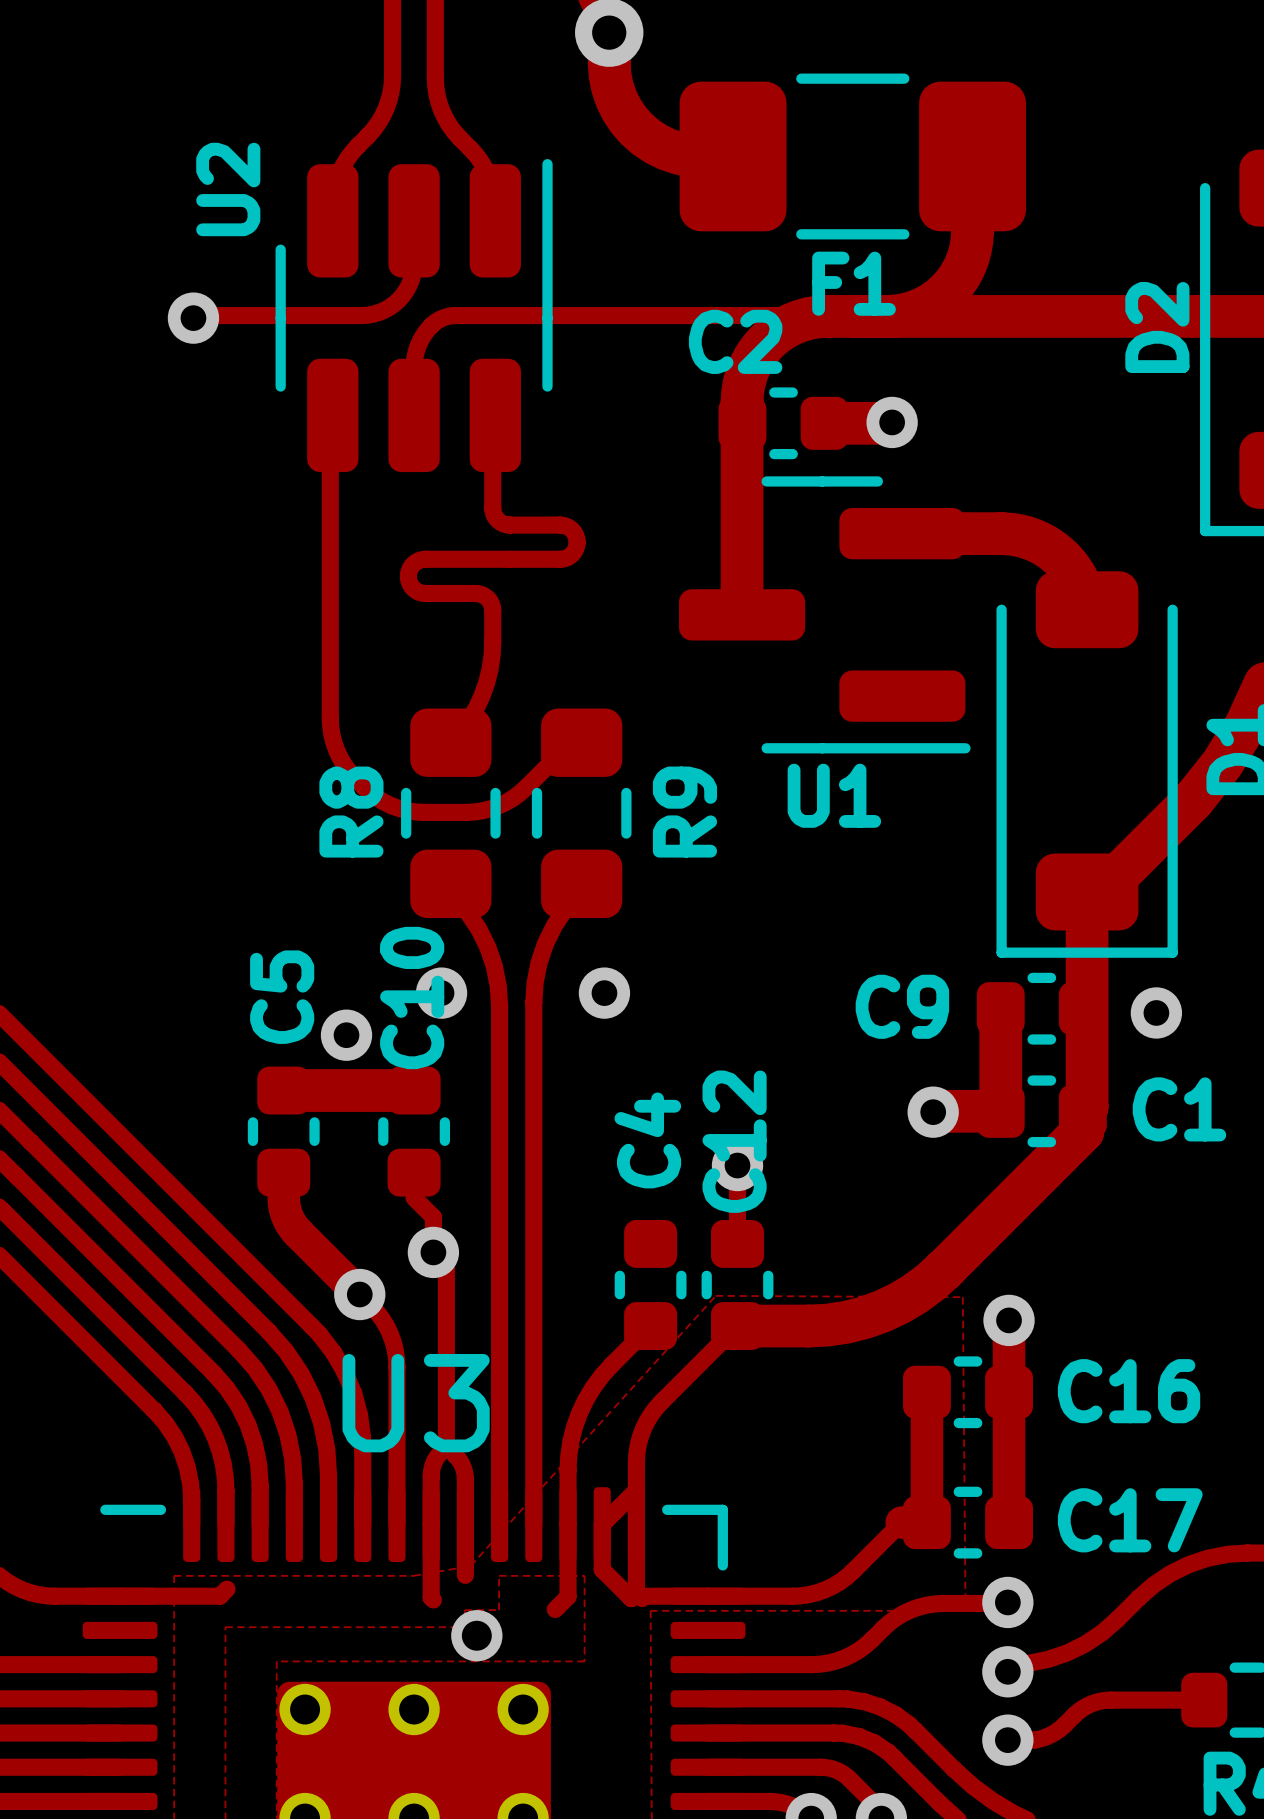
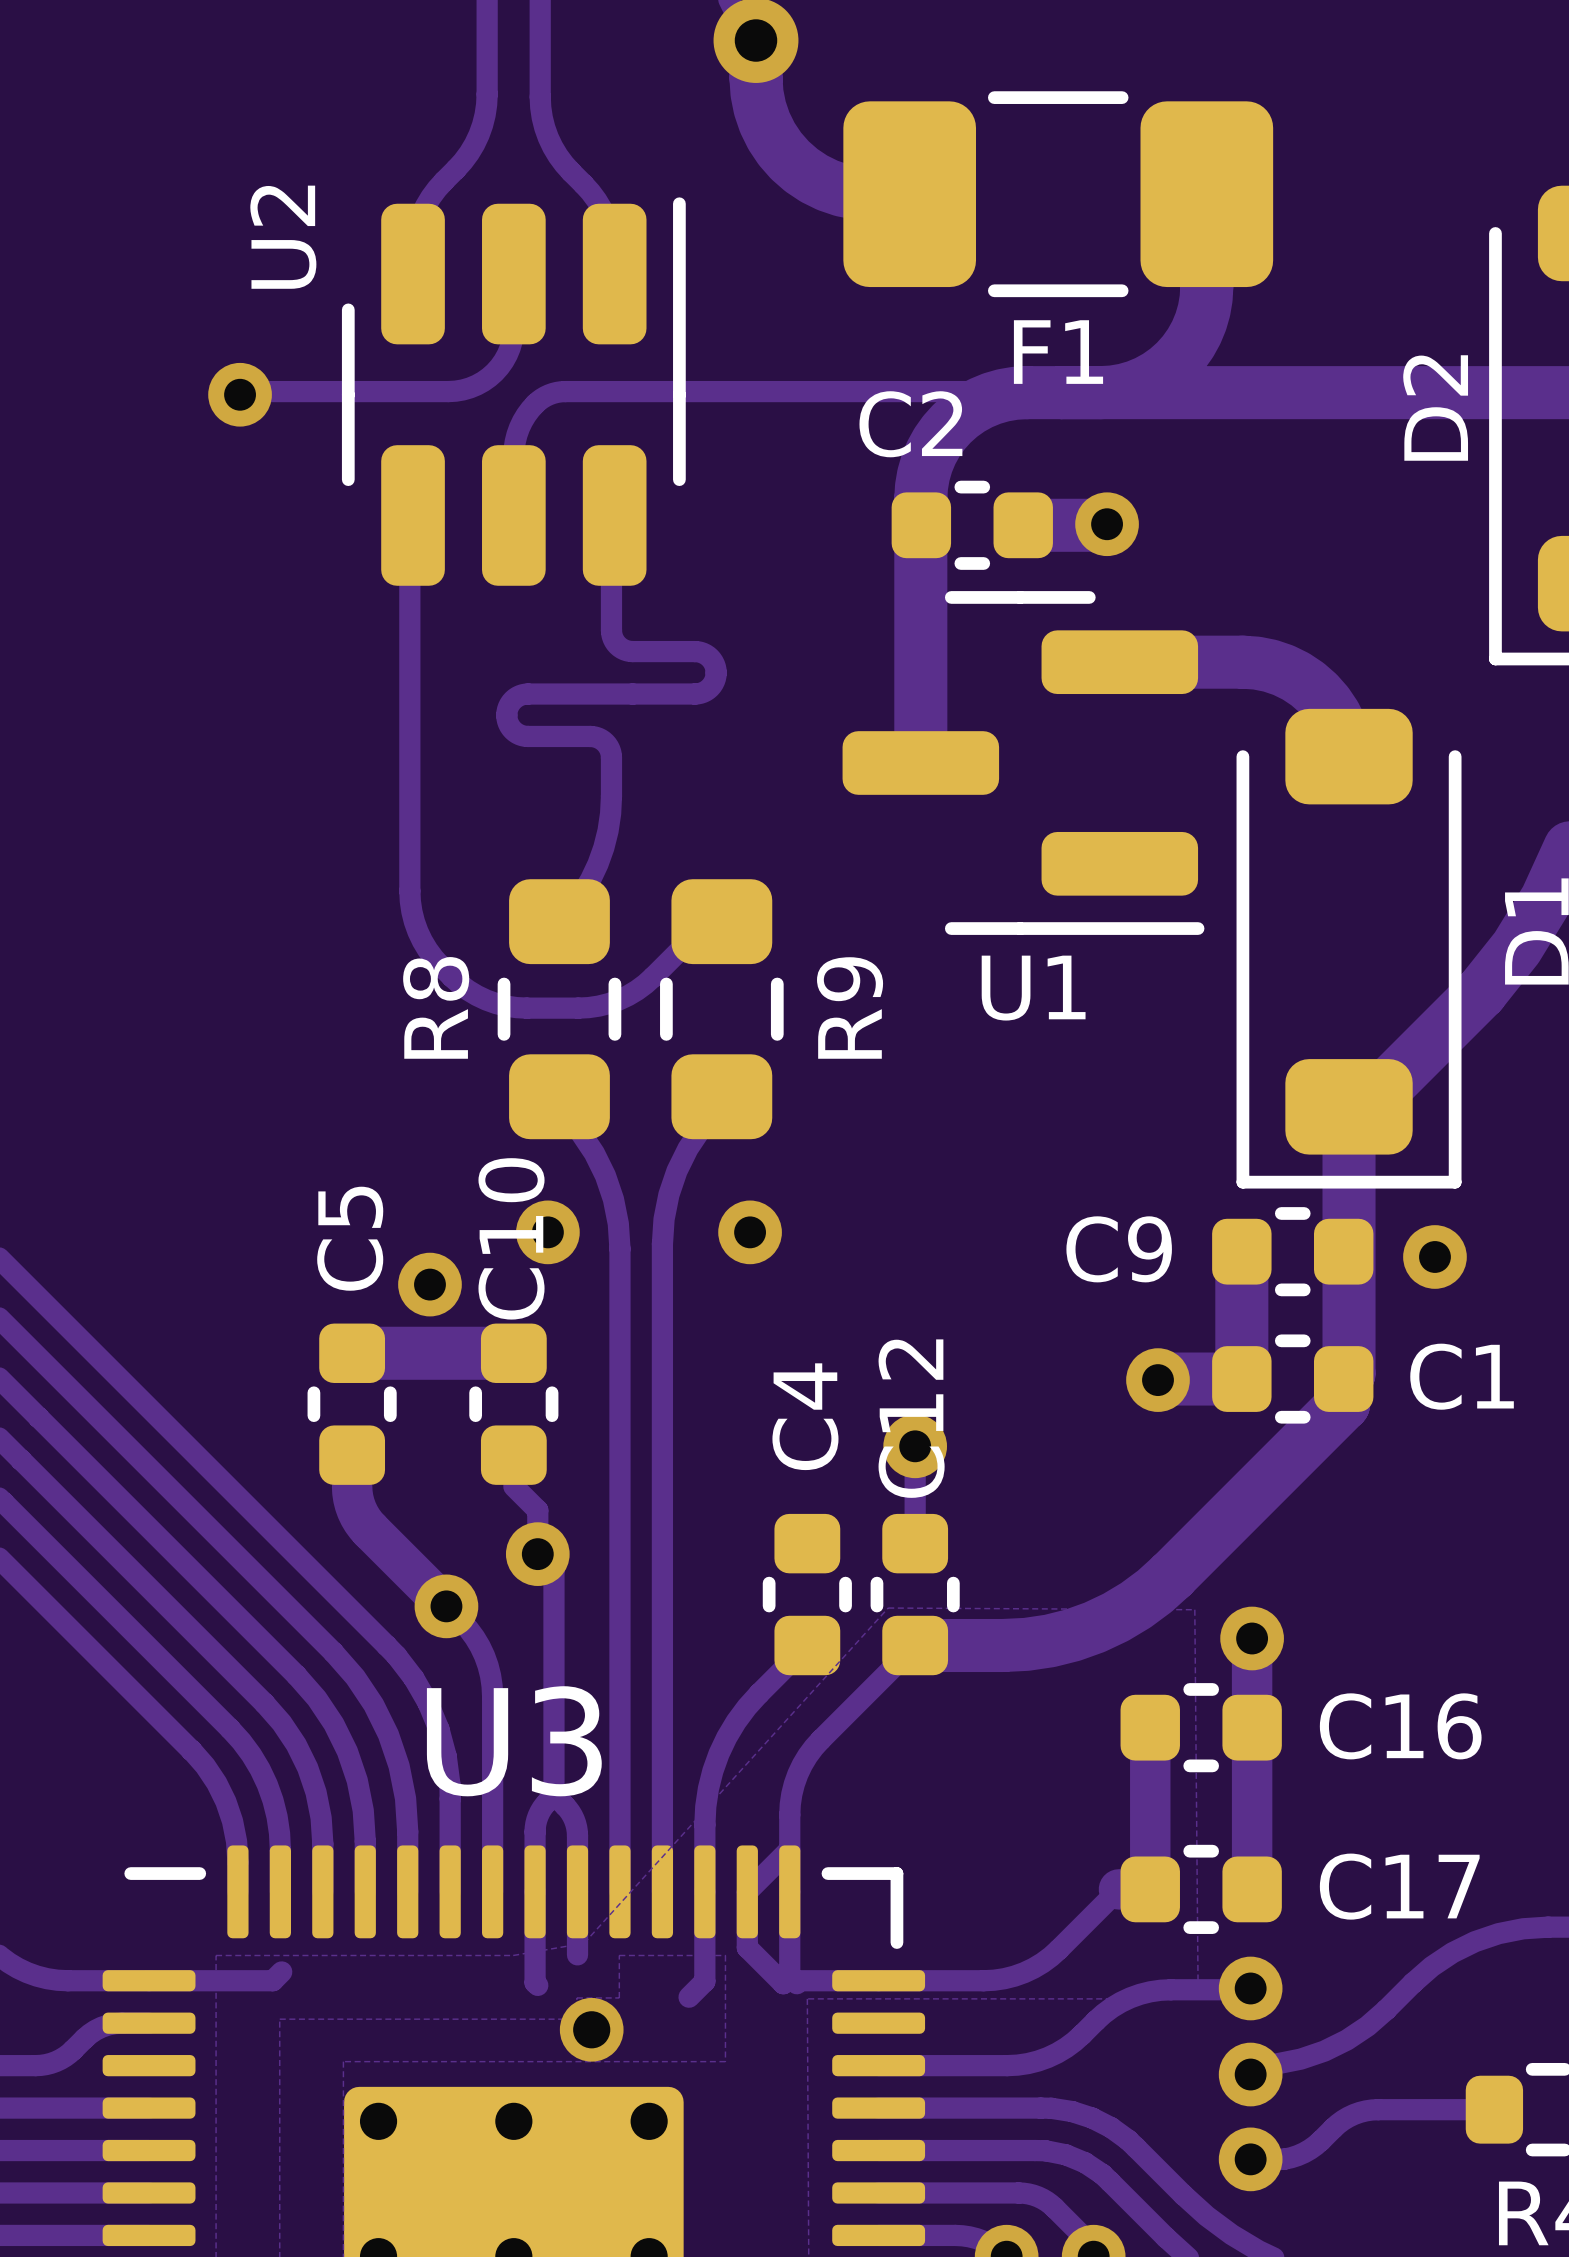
track: (28, 1664) (120, 1664) -> (35, 2065) (45, 2064) (60, 2059) (89, 2034) (101, 2027) (115, 2023) (149, 2023)

